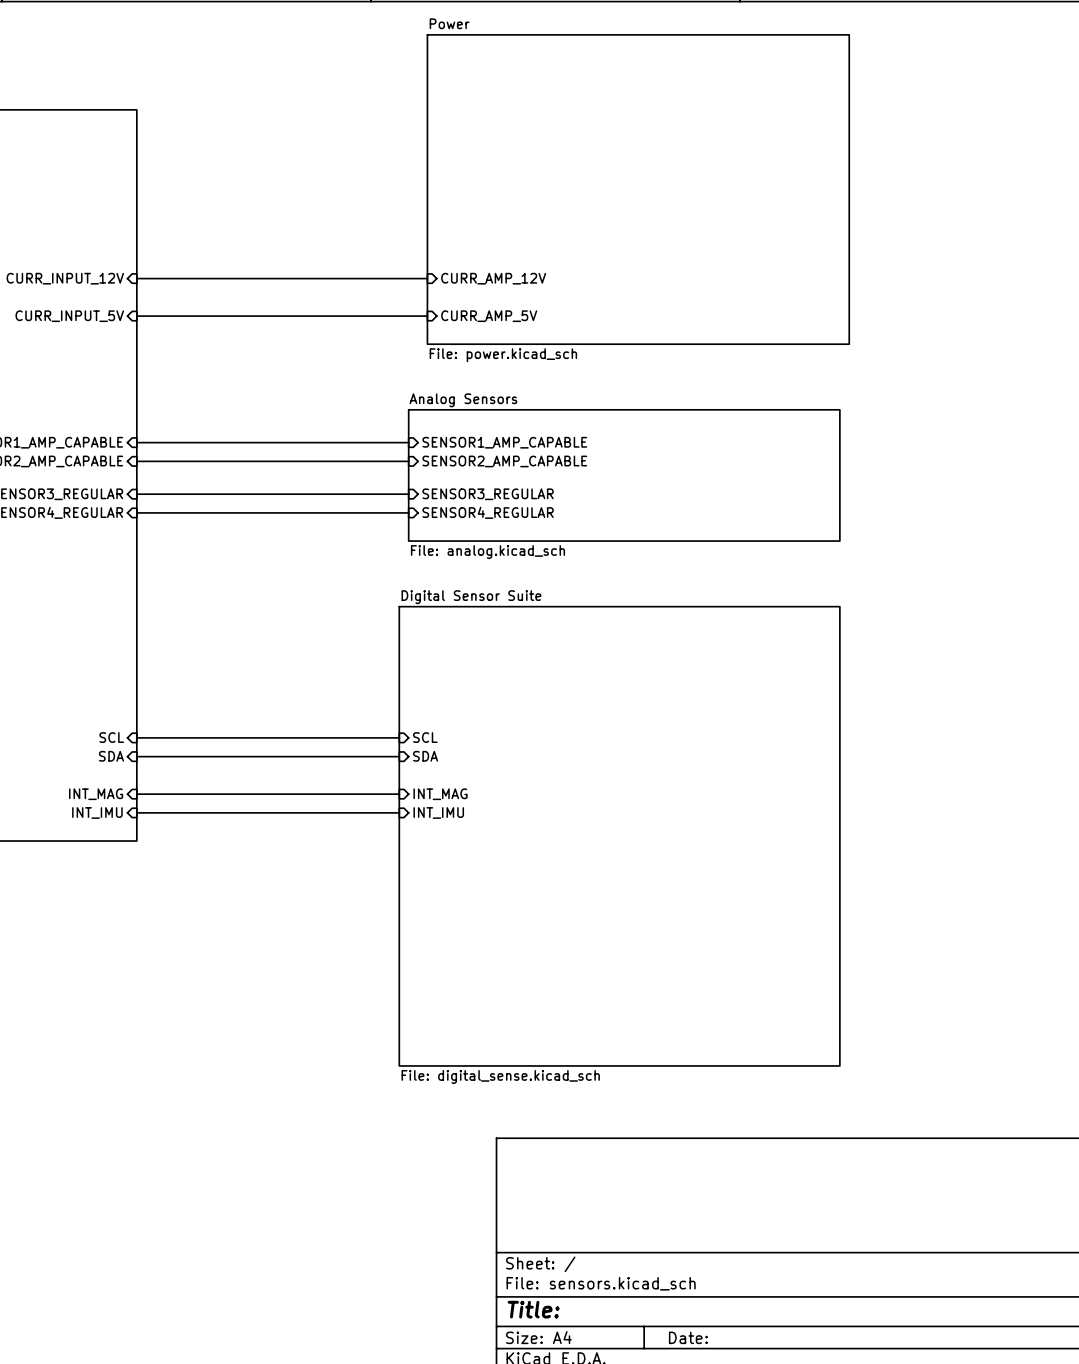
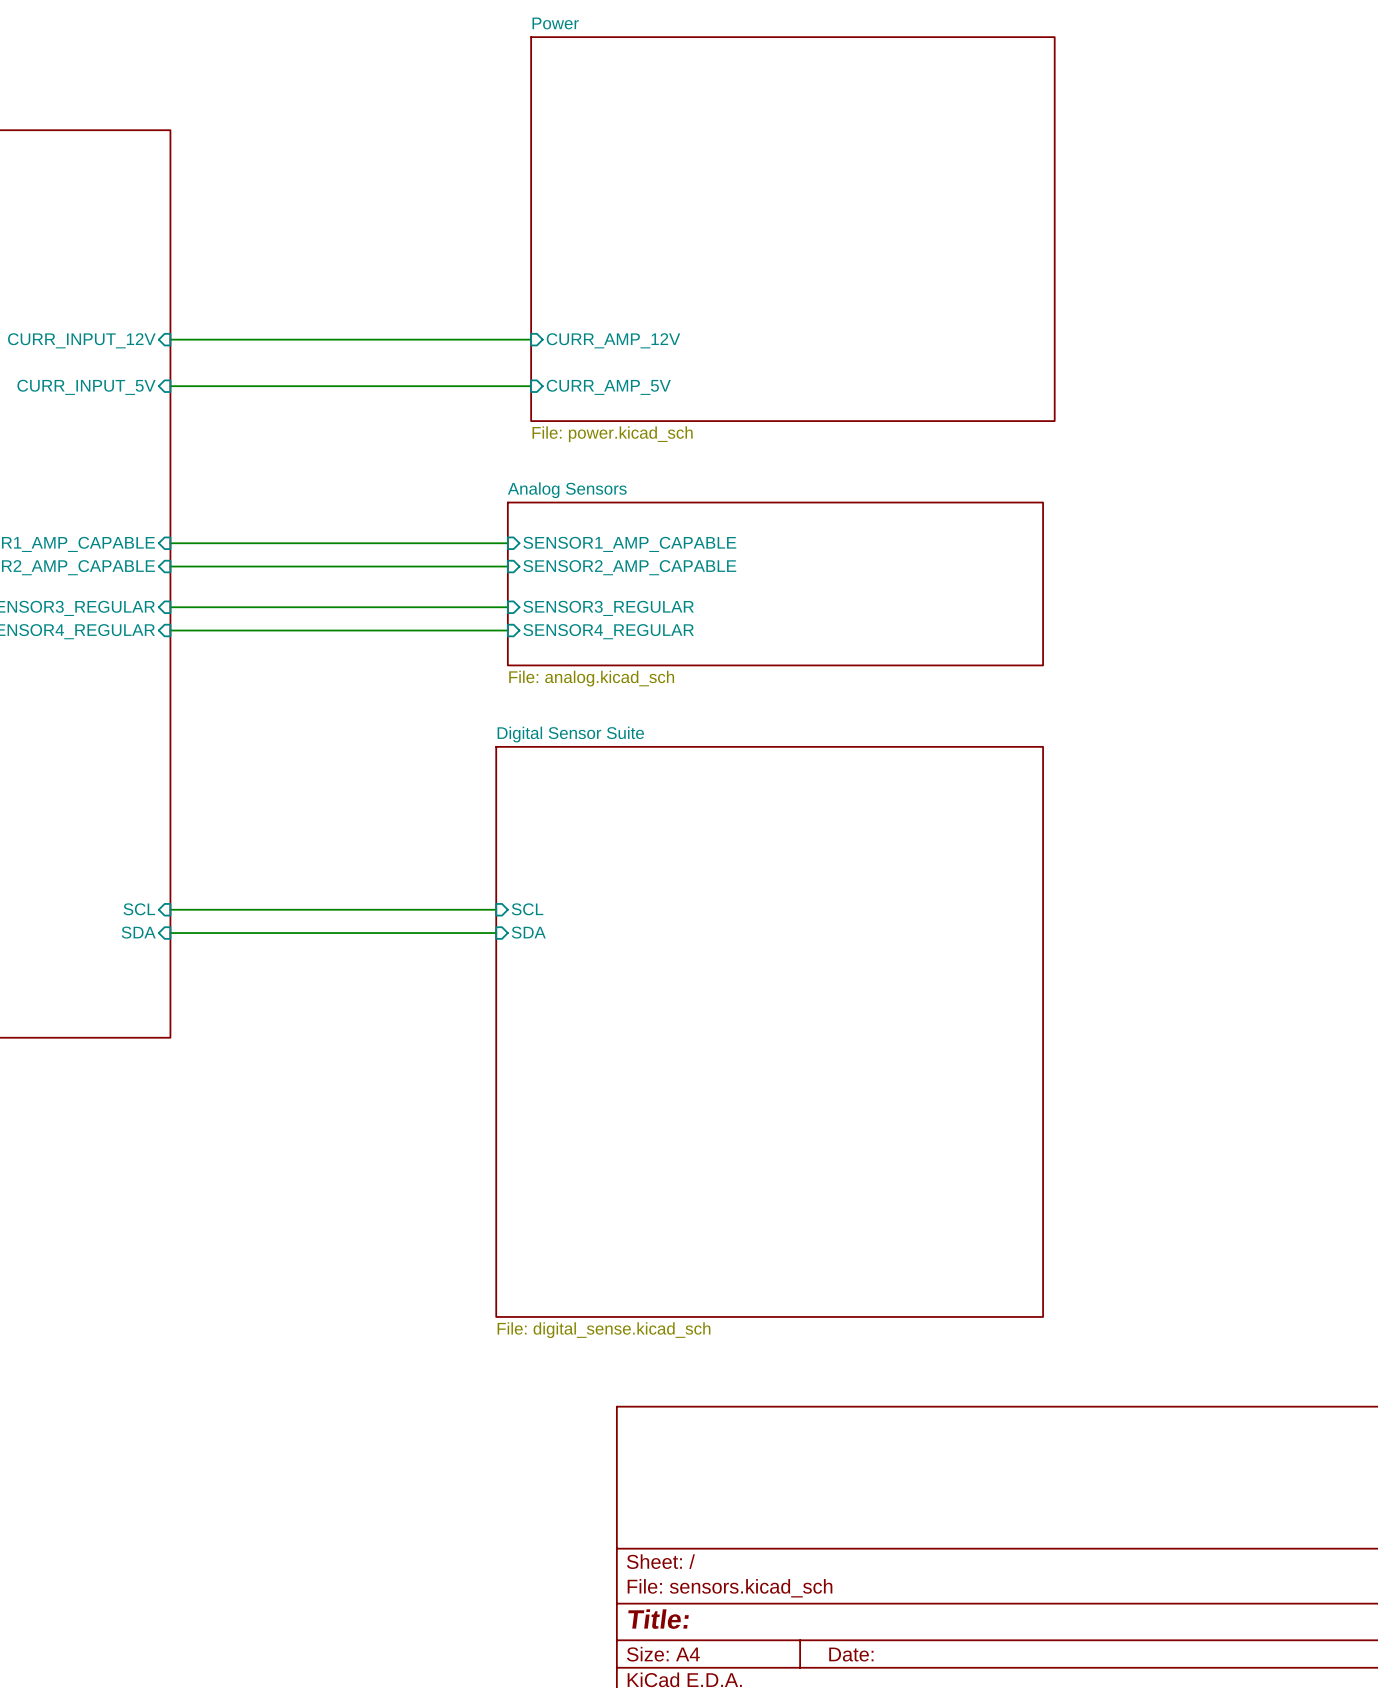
sheet pin: INT_MAG (96, 794) -> none
wire: (136, 794) (399, 794) -> none
sheet pin: INT_MAG (440, 794) -> none
sheet pin: INT_IMU (97, 812) -> none
wire: (136, 812) (399, 812) -> none
sheet pin: INT_IMU (438, 812) -> none

